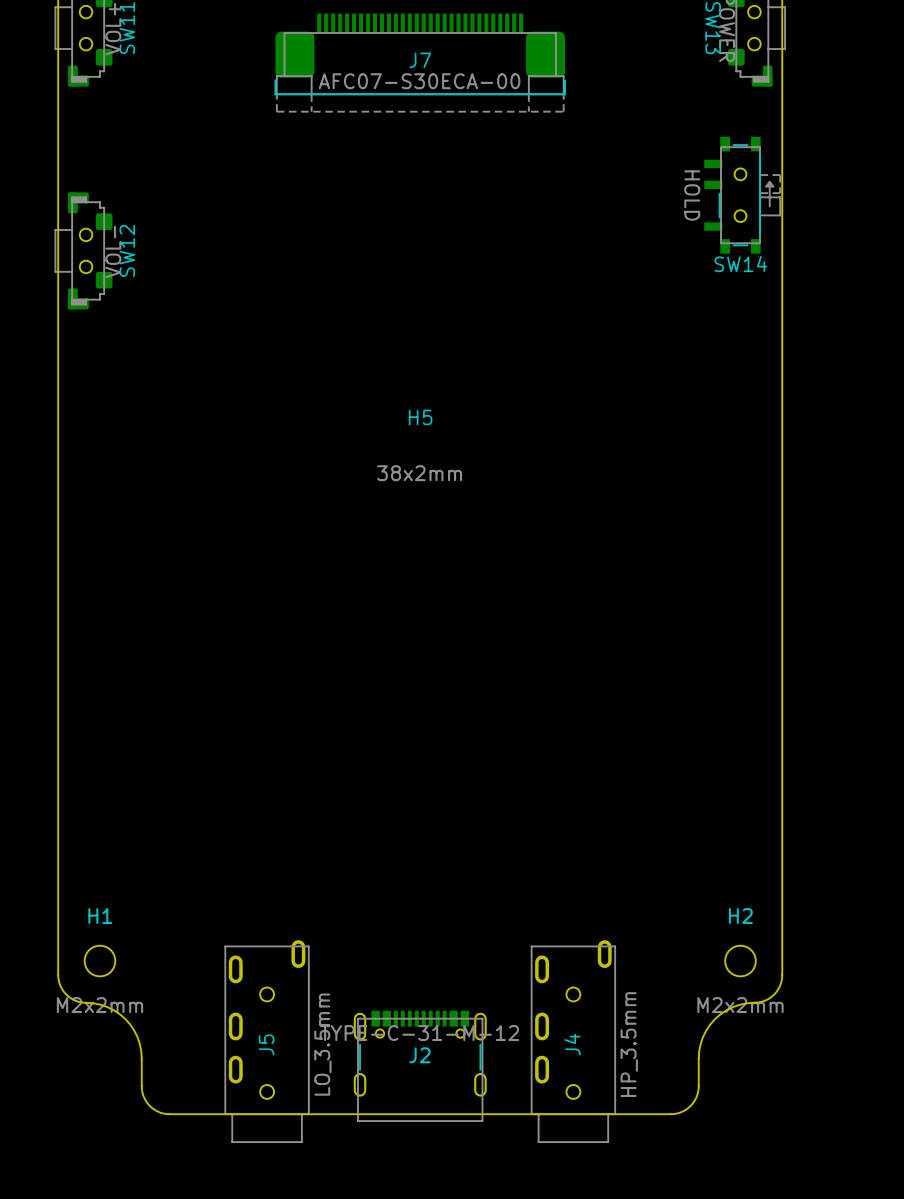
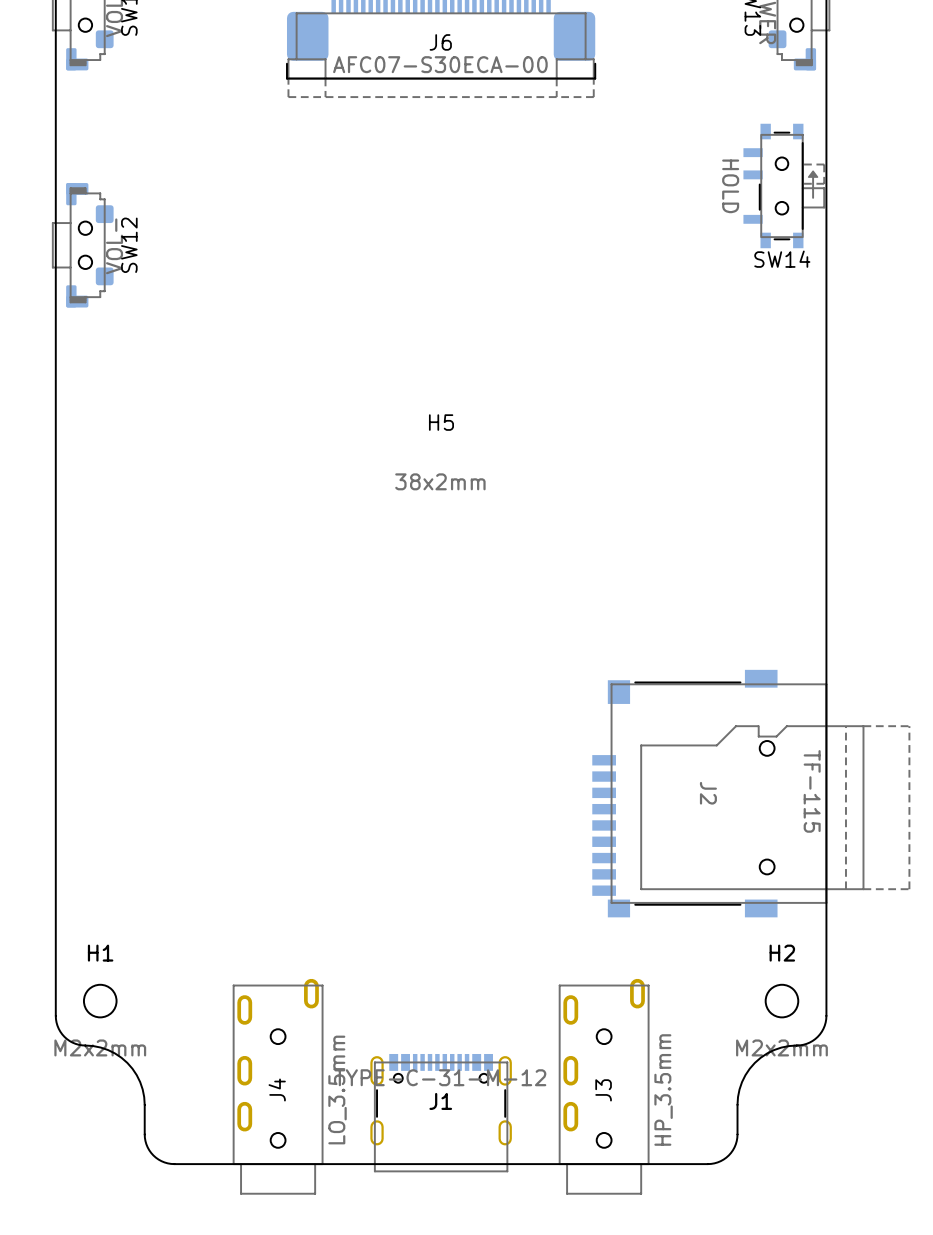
J7 name: J7 (420, 60) -> J6 (440, 42)
J2: none -> TF-115 (751, 793)
J5 name: J5 (266, 1044) -> J4 (277, 1090)
J4 name: J4 (572, 1044) -> J3 (603, 1090)
J2 name: J2 (419, 1055) -> J1 (440, 1101)

